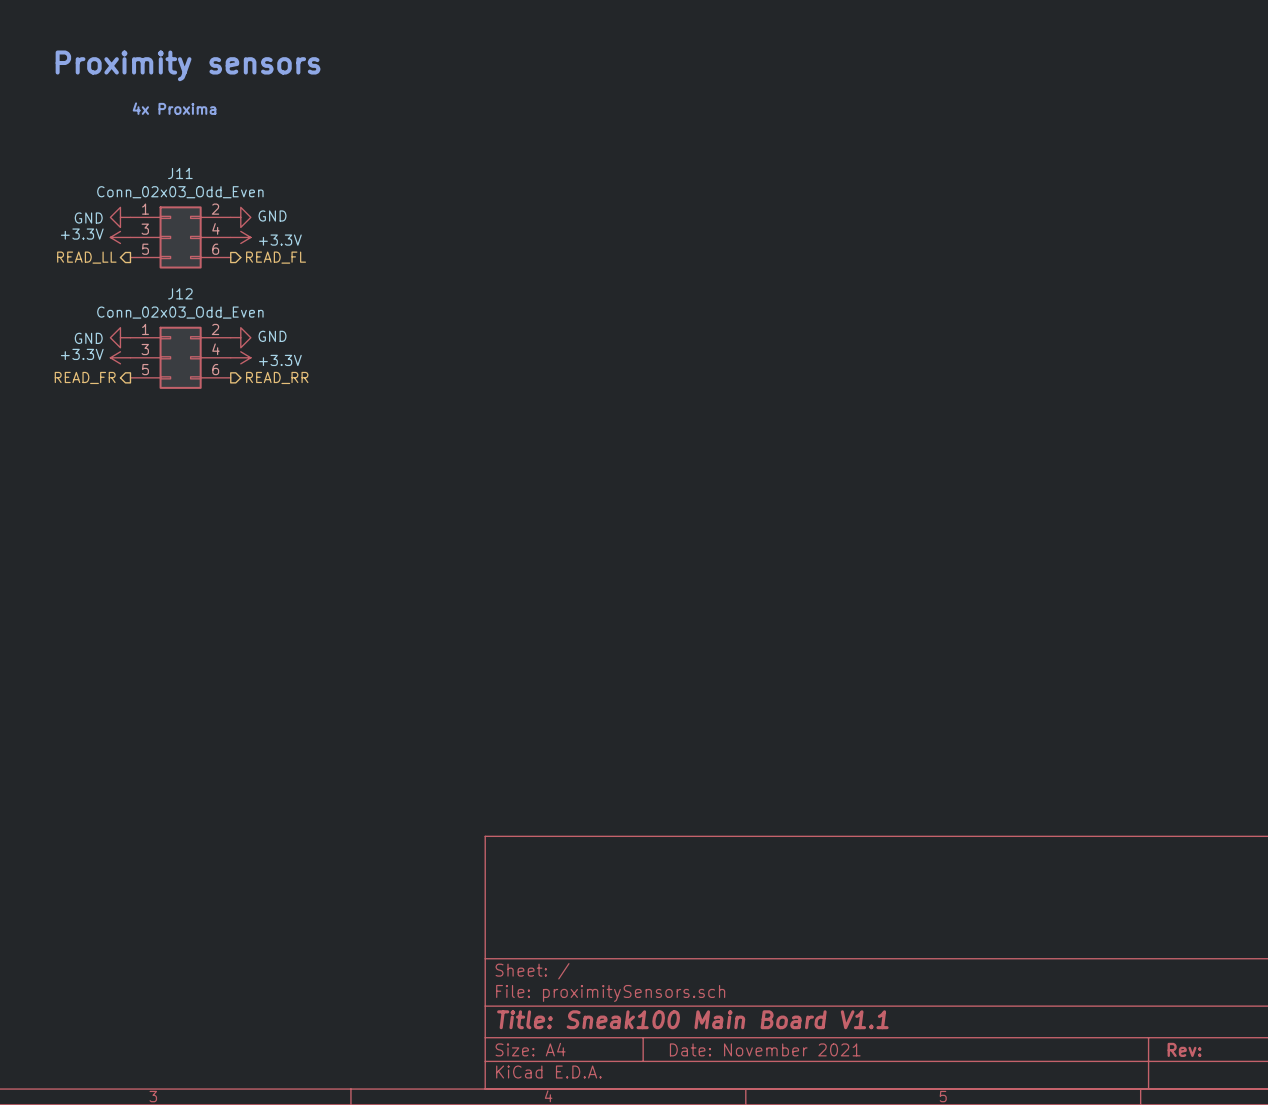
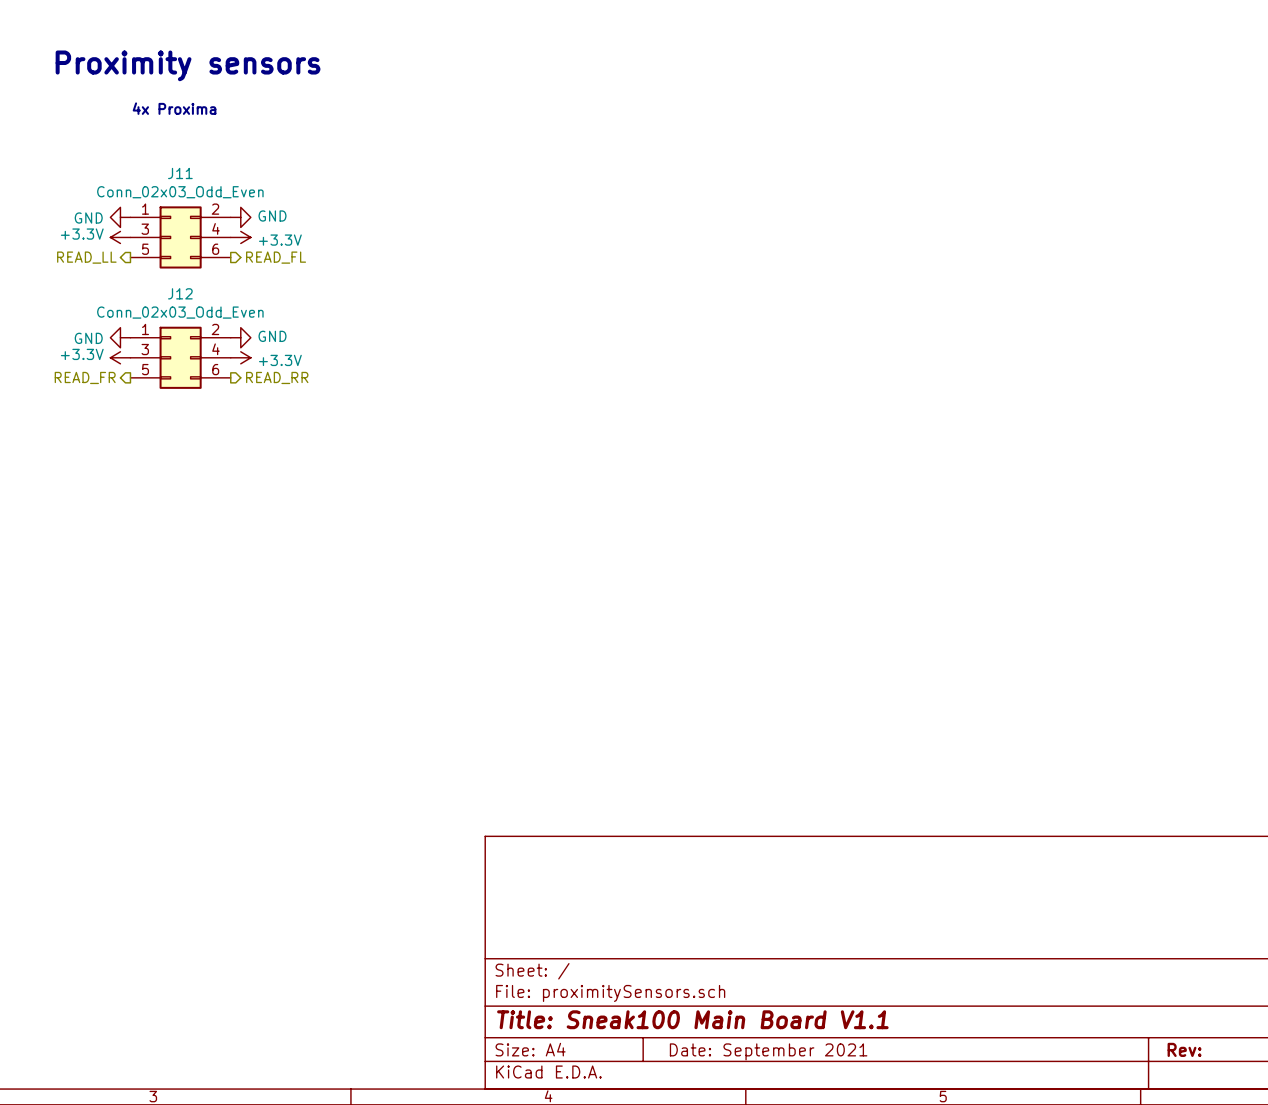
title block: Date: November 2021 (765, 1049) -> Date: September 2021 (768, 1051)

